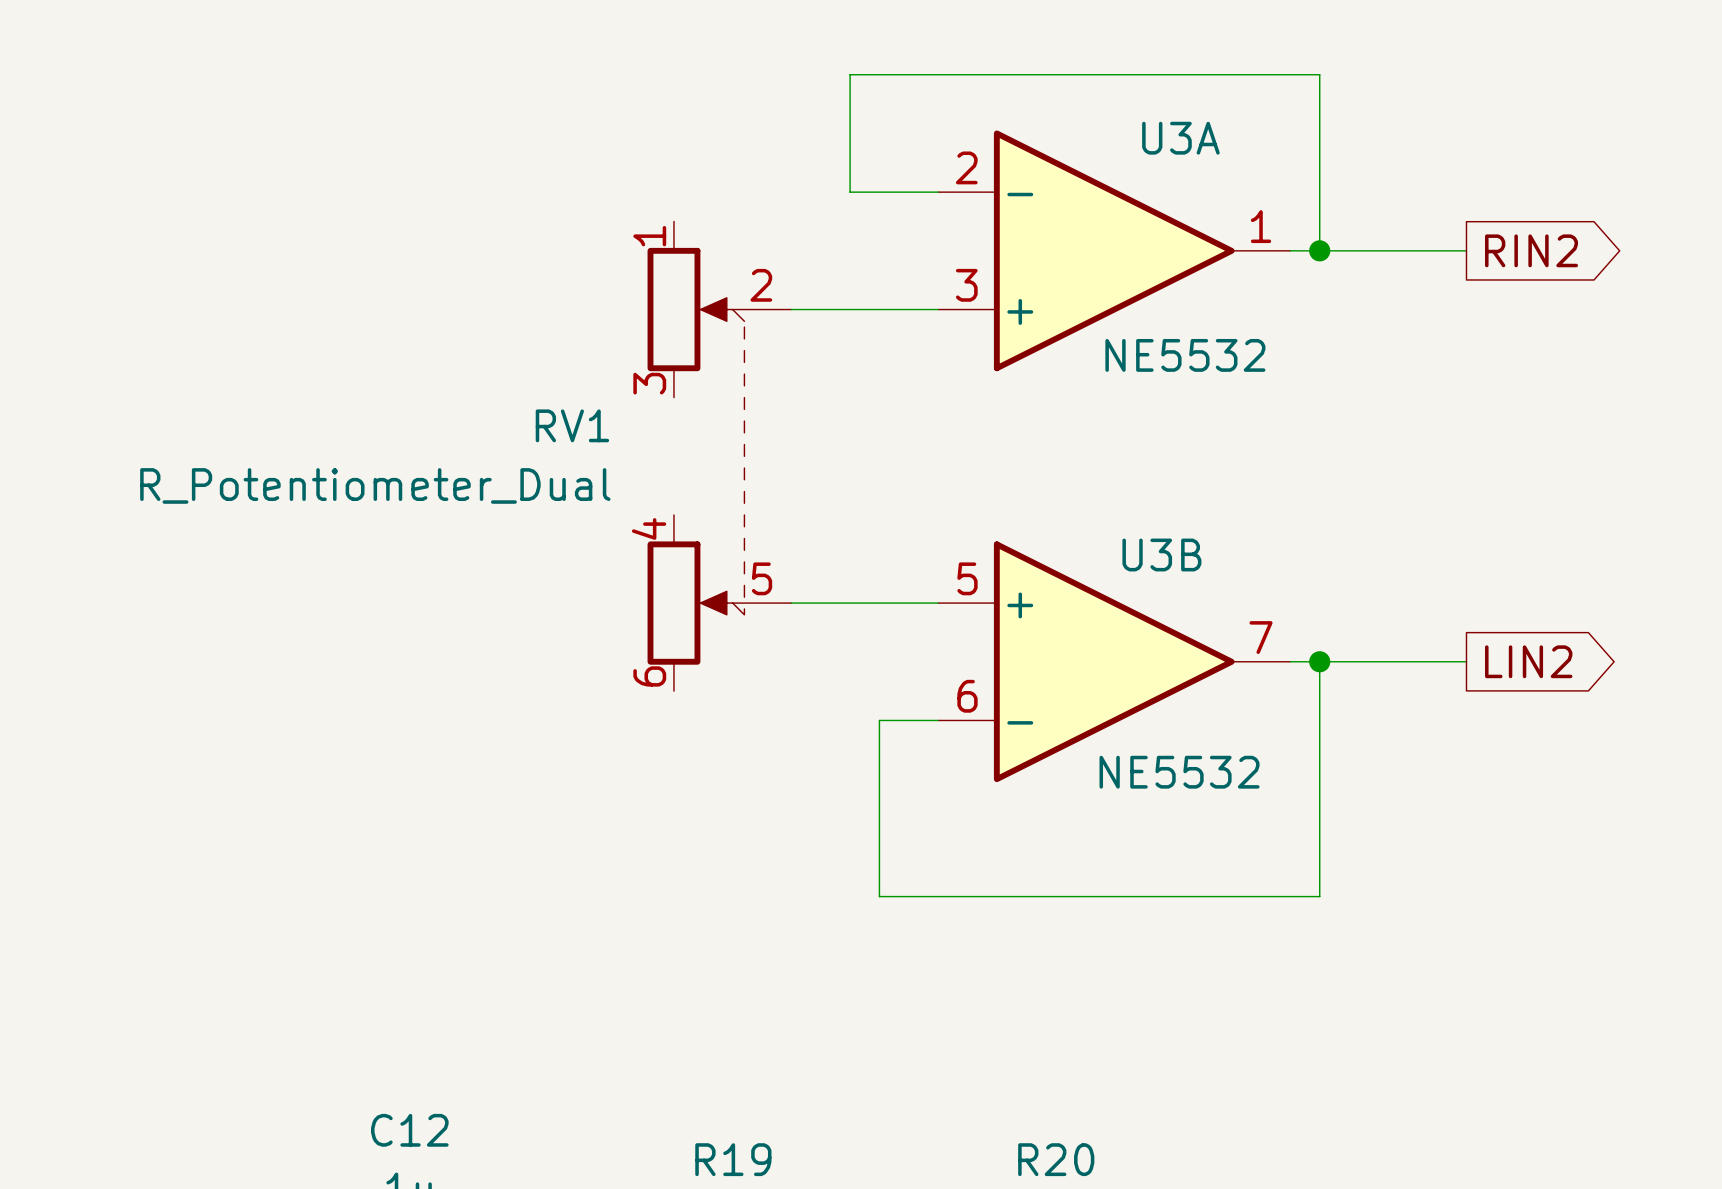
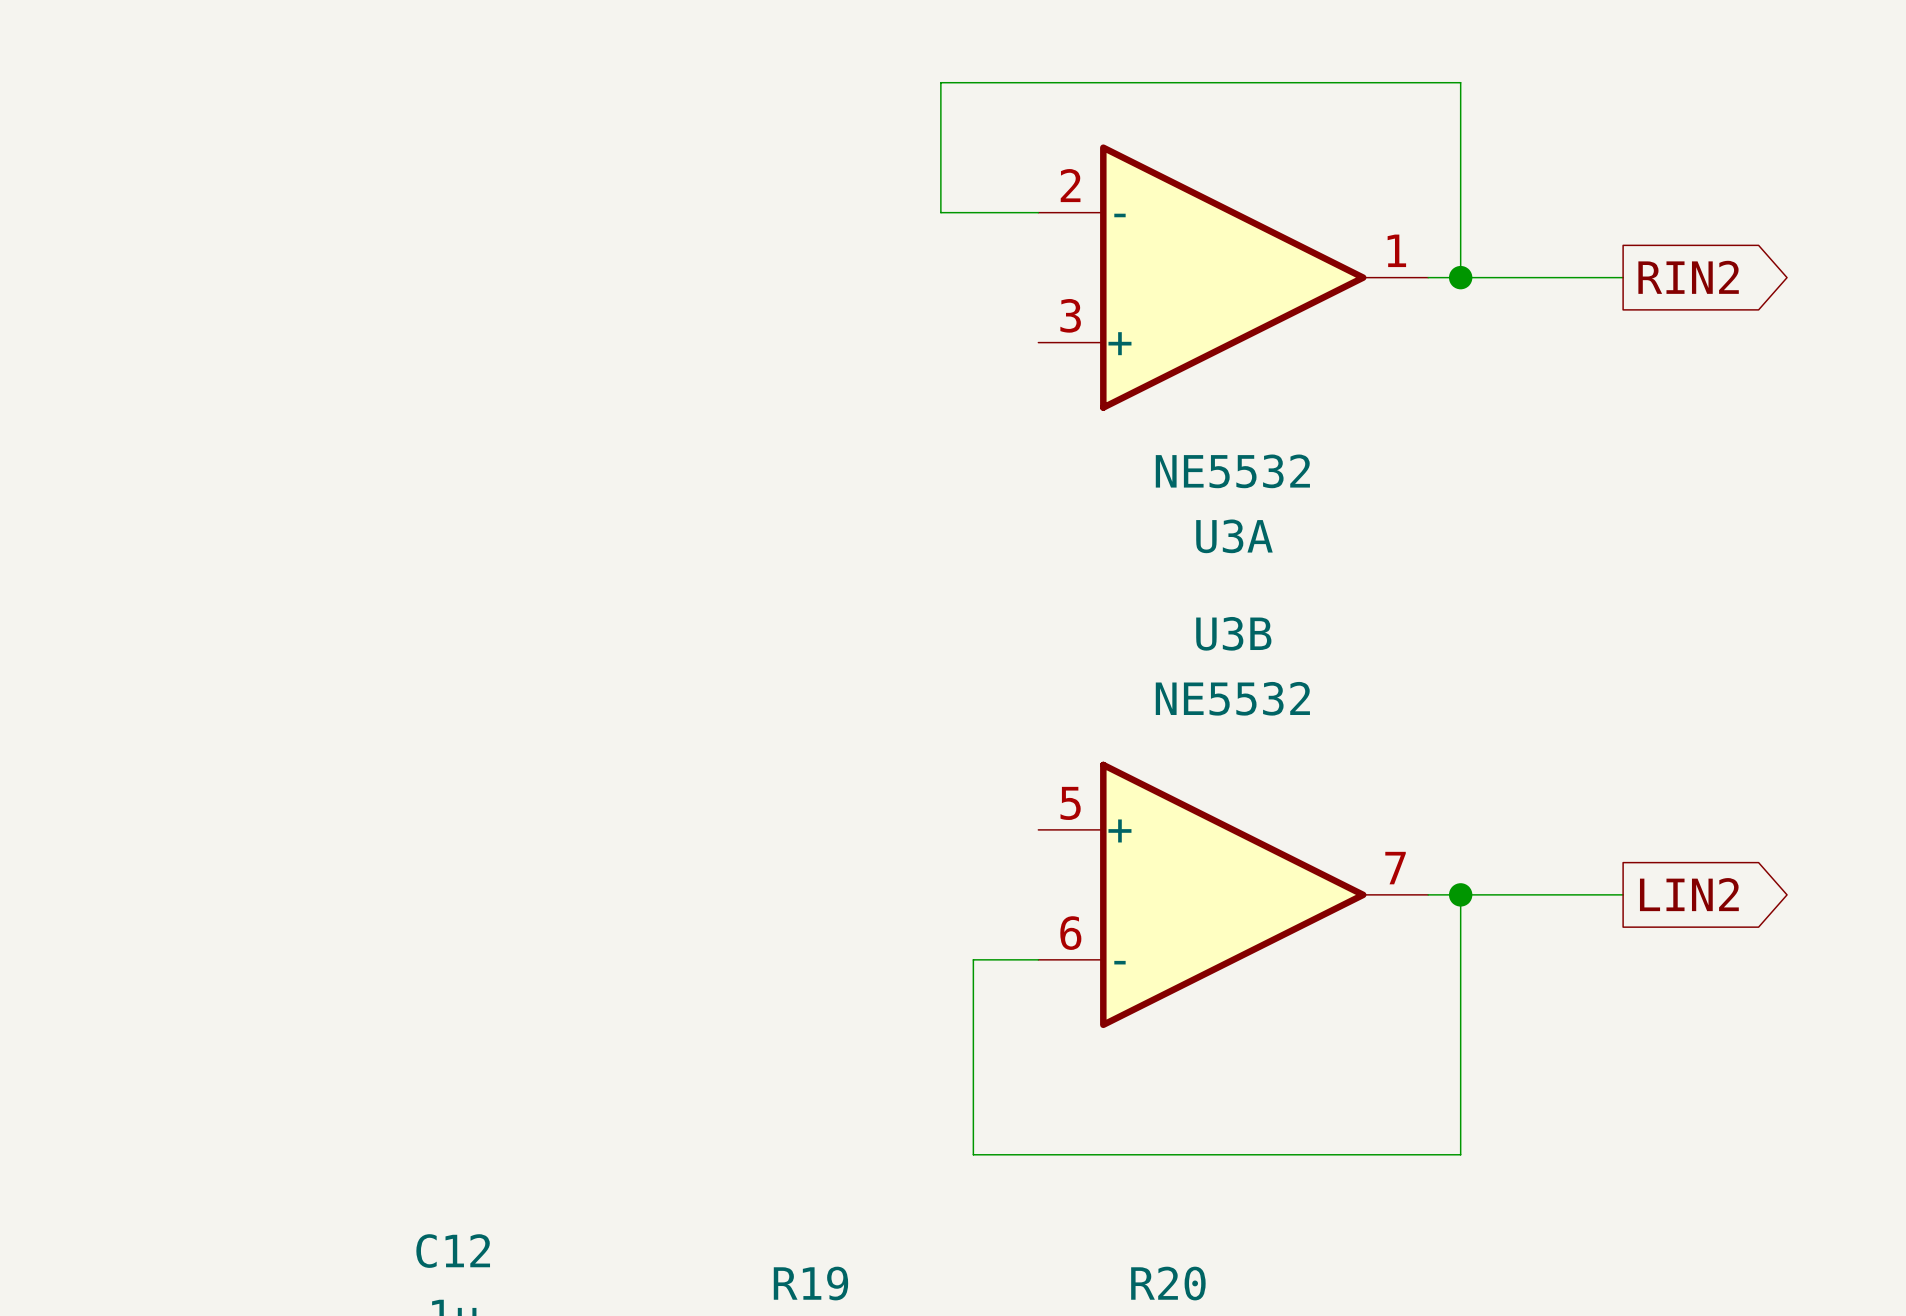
U3A name position: U3A (1180, 138) -> U3A (1234, 536)
wire: (791, 309) (938, 309) -> none
U3A value position: NE5532 (1185, 355) -> NE5532 (1232, 471)
RV1: R_Potentiometer_Dual (719, 456) -> none
U3B name position: U3B (1161, 555) -> U3B (1233, 633)
wire: (791, 603) (938, 603) -> none
U3B position: (1114, 661) -> (1233, 894)
wire: (1290, 661) (1466, 661) -> (1428, 894) (1623, 894)
wire: (1319, 661) (1319, 808) -> none
junction: (1319, 661) -> none
global label position: LIN2 (1528, 661) -> LIN2 (1689, 894)
wire: (938, 720) (879, 720) (879, 867) -> (1038, 959) (973, 959)
U3B value position: NE5532 (1179, 772) -> NE5532 (1232, 698)
junction: none -> (1460, 894)
wire: (879, 896) (1319, 896) -> (973, 992) (973, 1154) (1460, 1154) (1460, 992)

